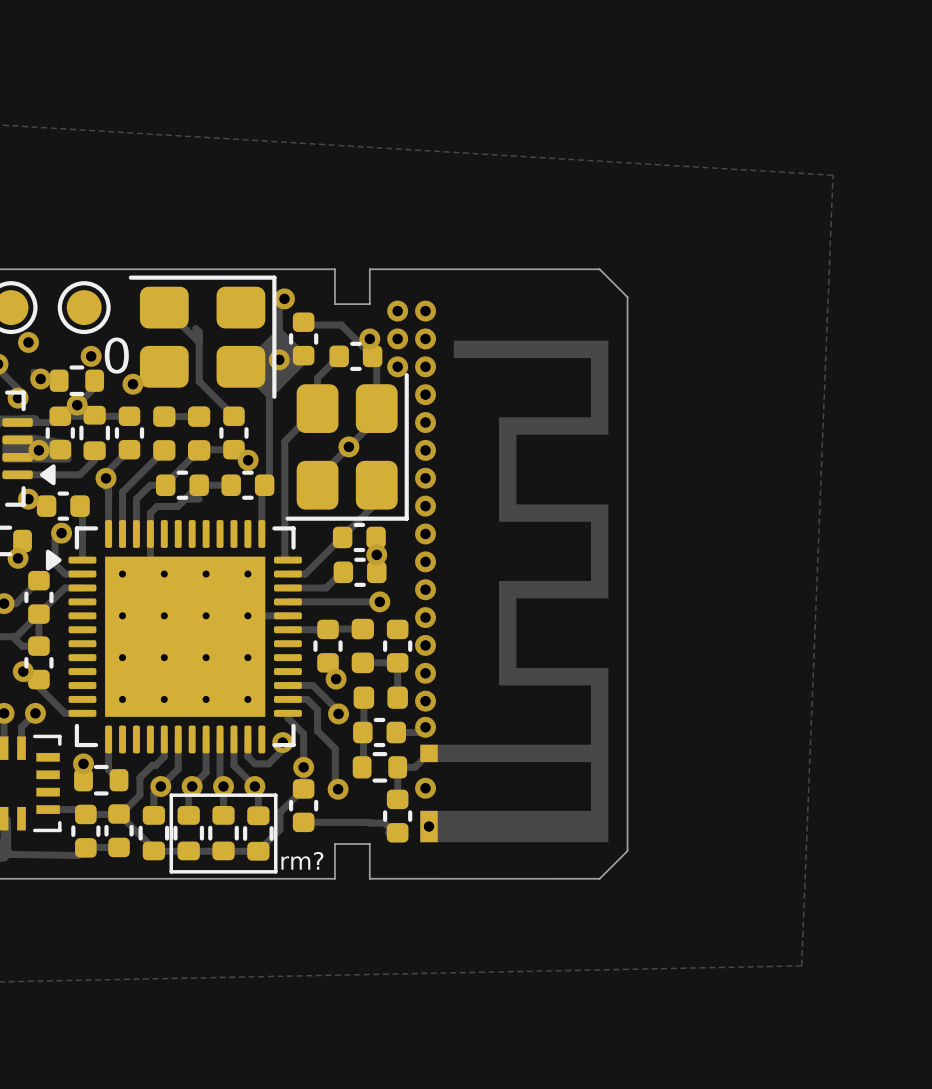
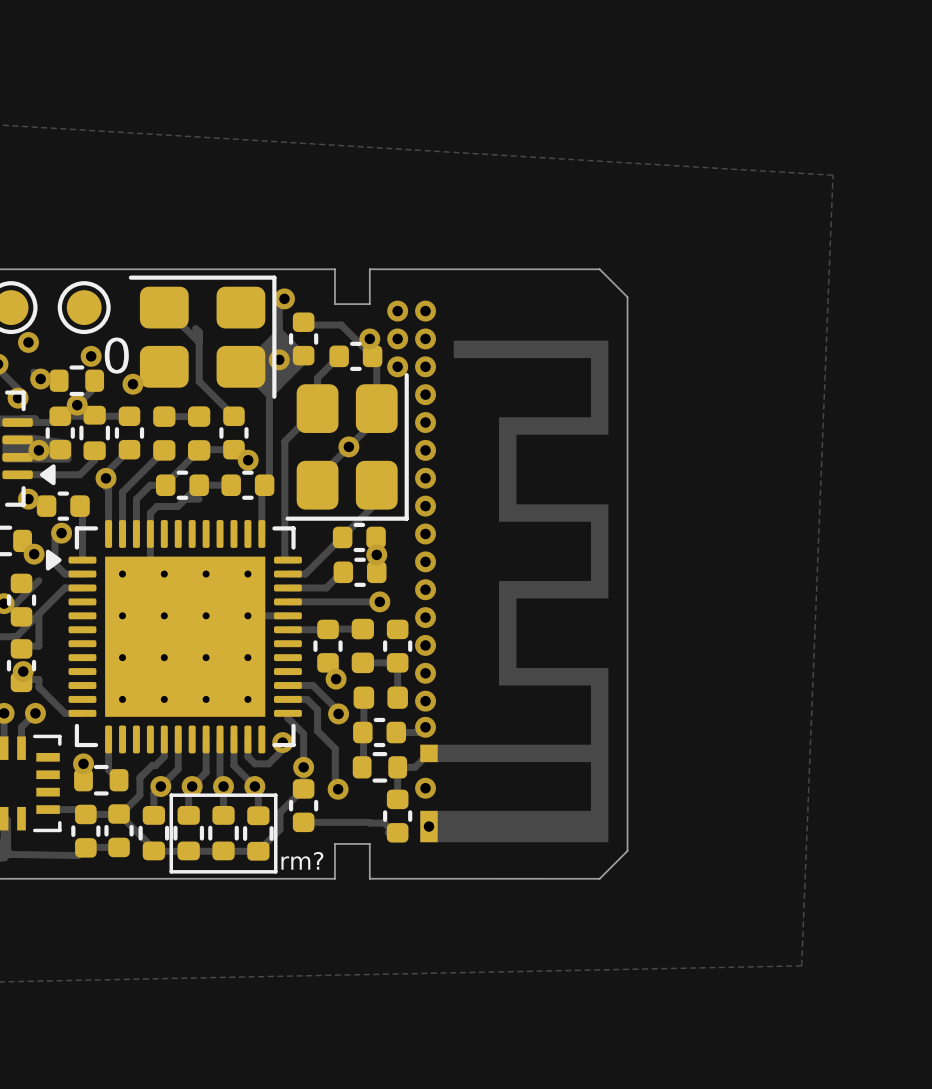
via position: (18, 558) -> (34, 554)
part position: (38, 597) -> (21, 600)
part position: (38, 662) -> (21, 665)

